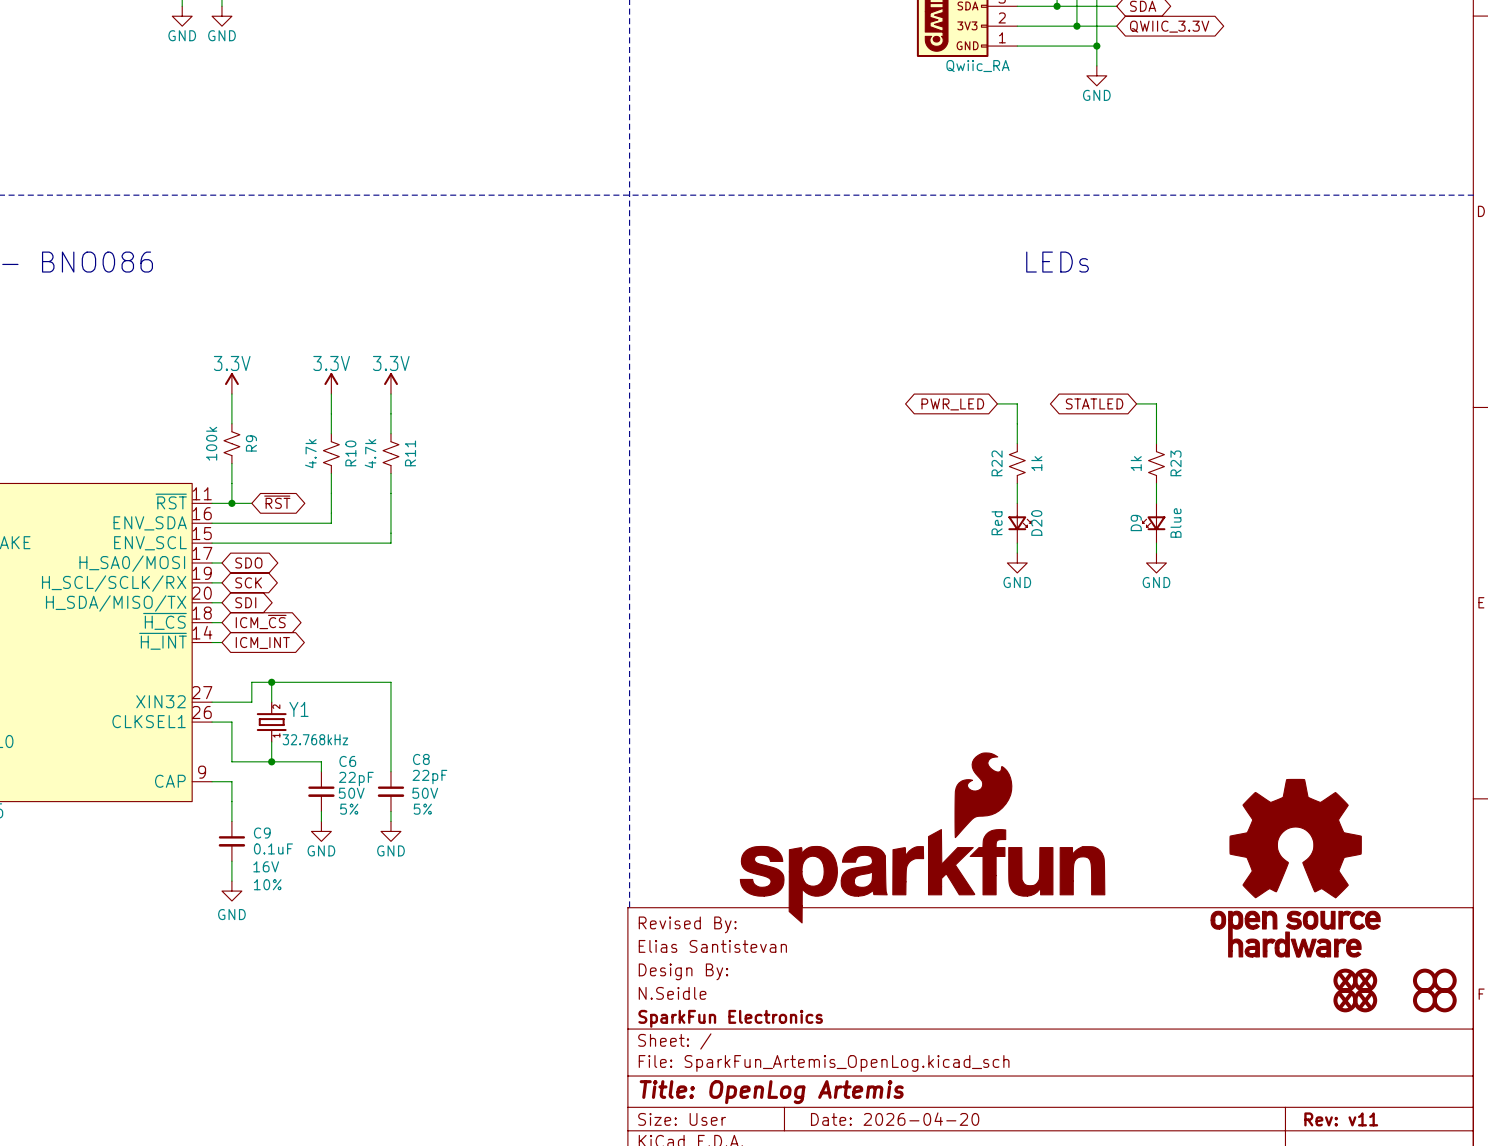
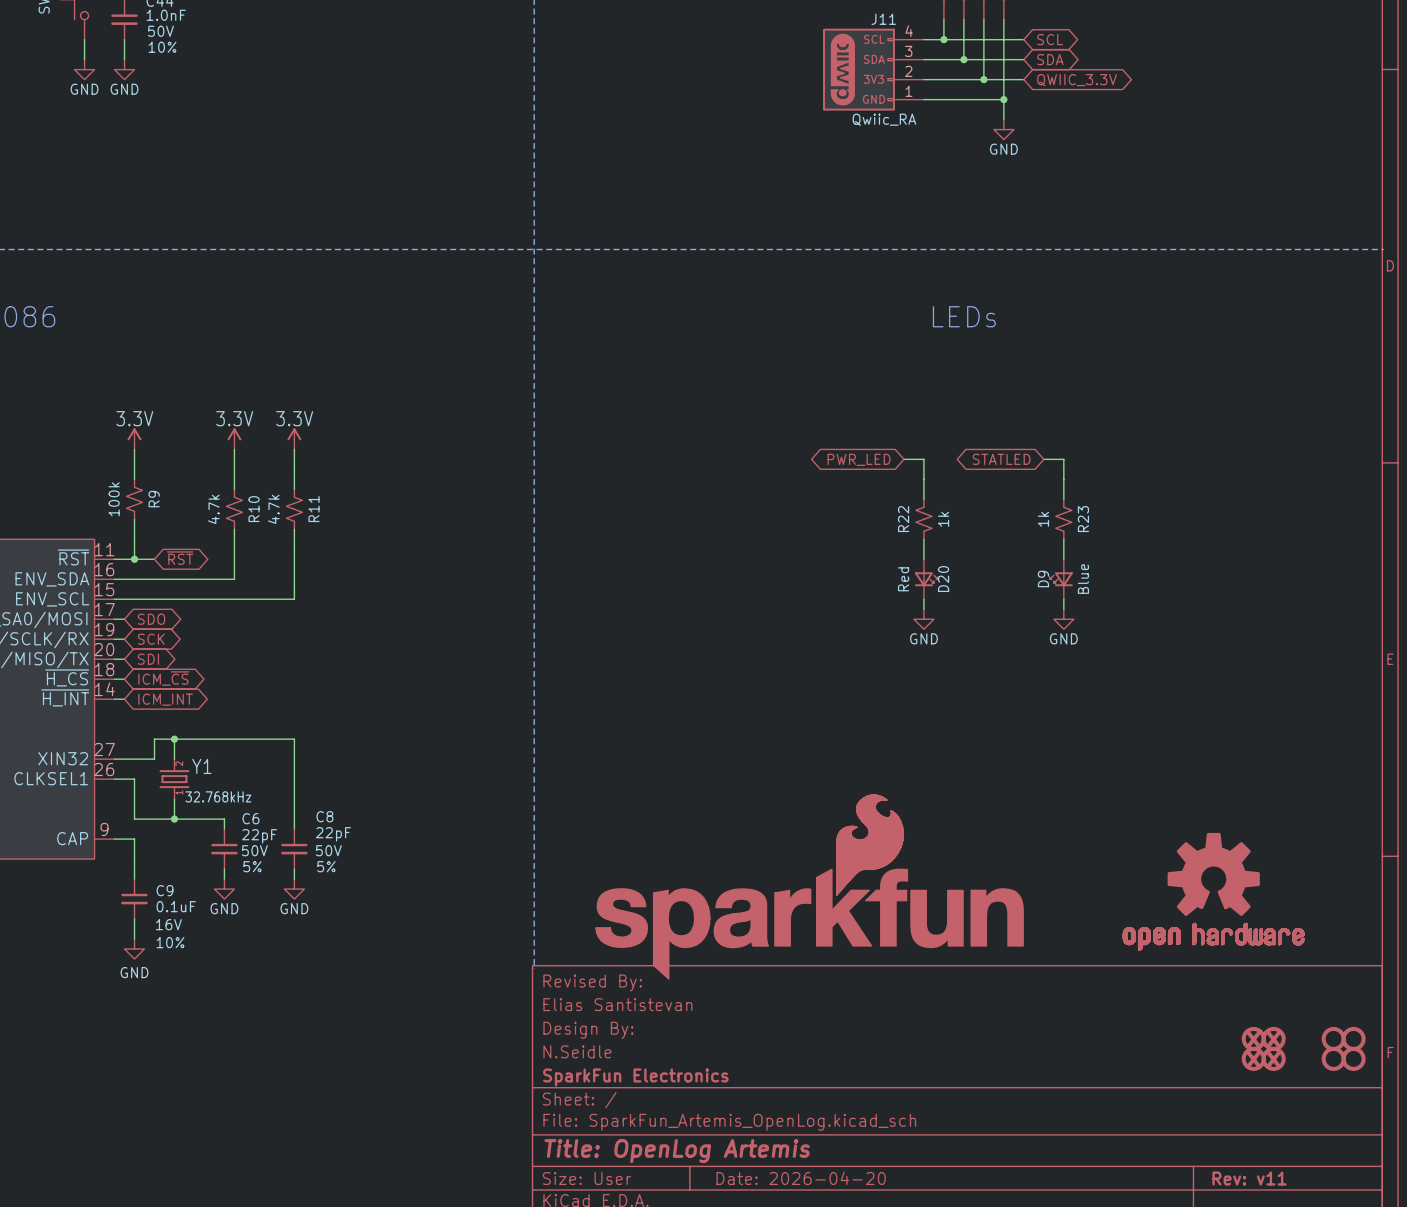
part: none -> (870, 845)
part: none -> (1213, 891)
part: (922, 837) -> none
part: none -> (809, 924)
part: (1295, 868) -> none

